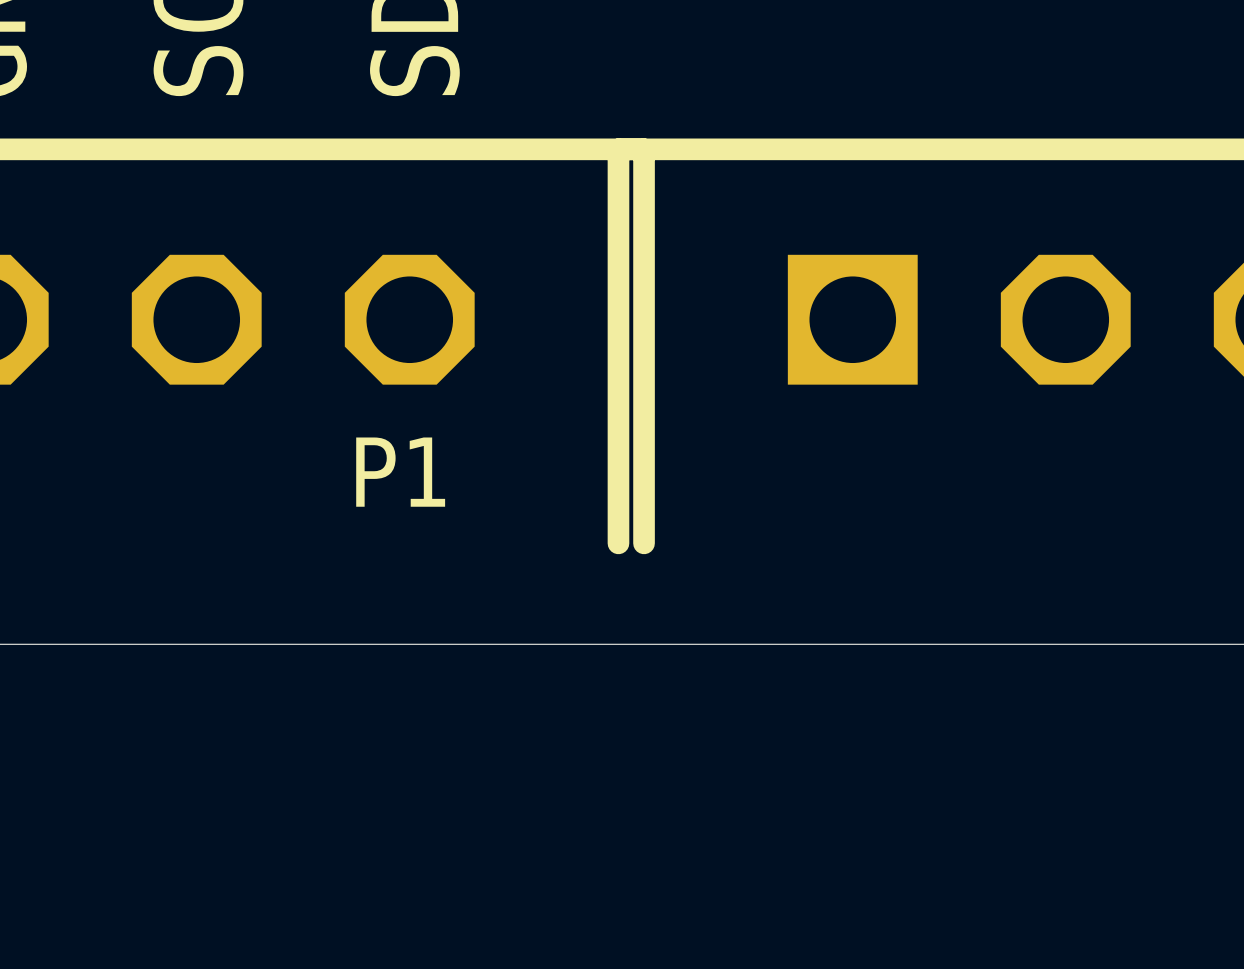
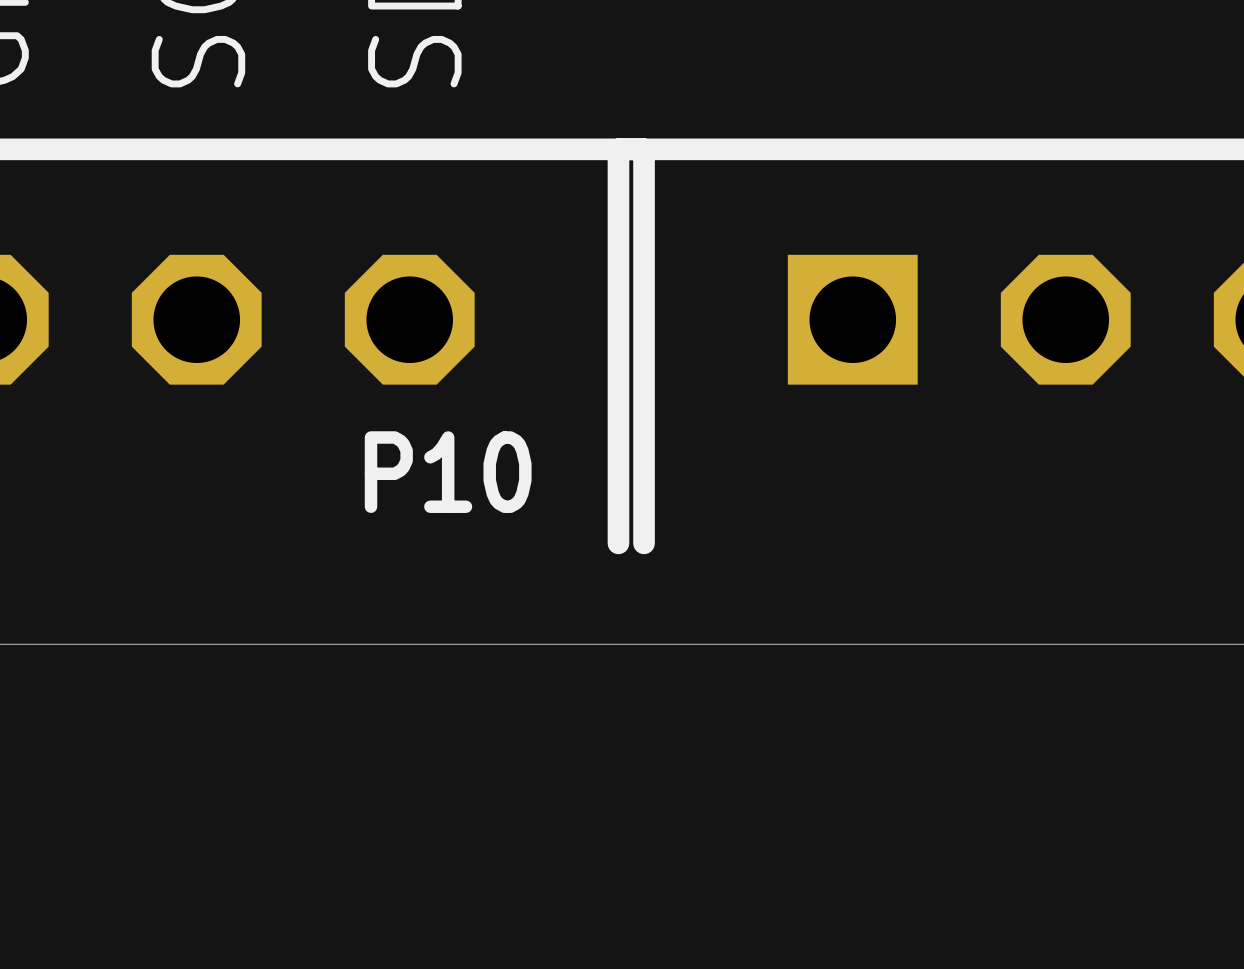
P1 name: P1 (400, 472) -> P10 (448, 472)

